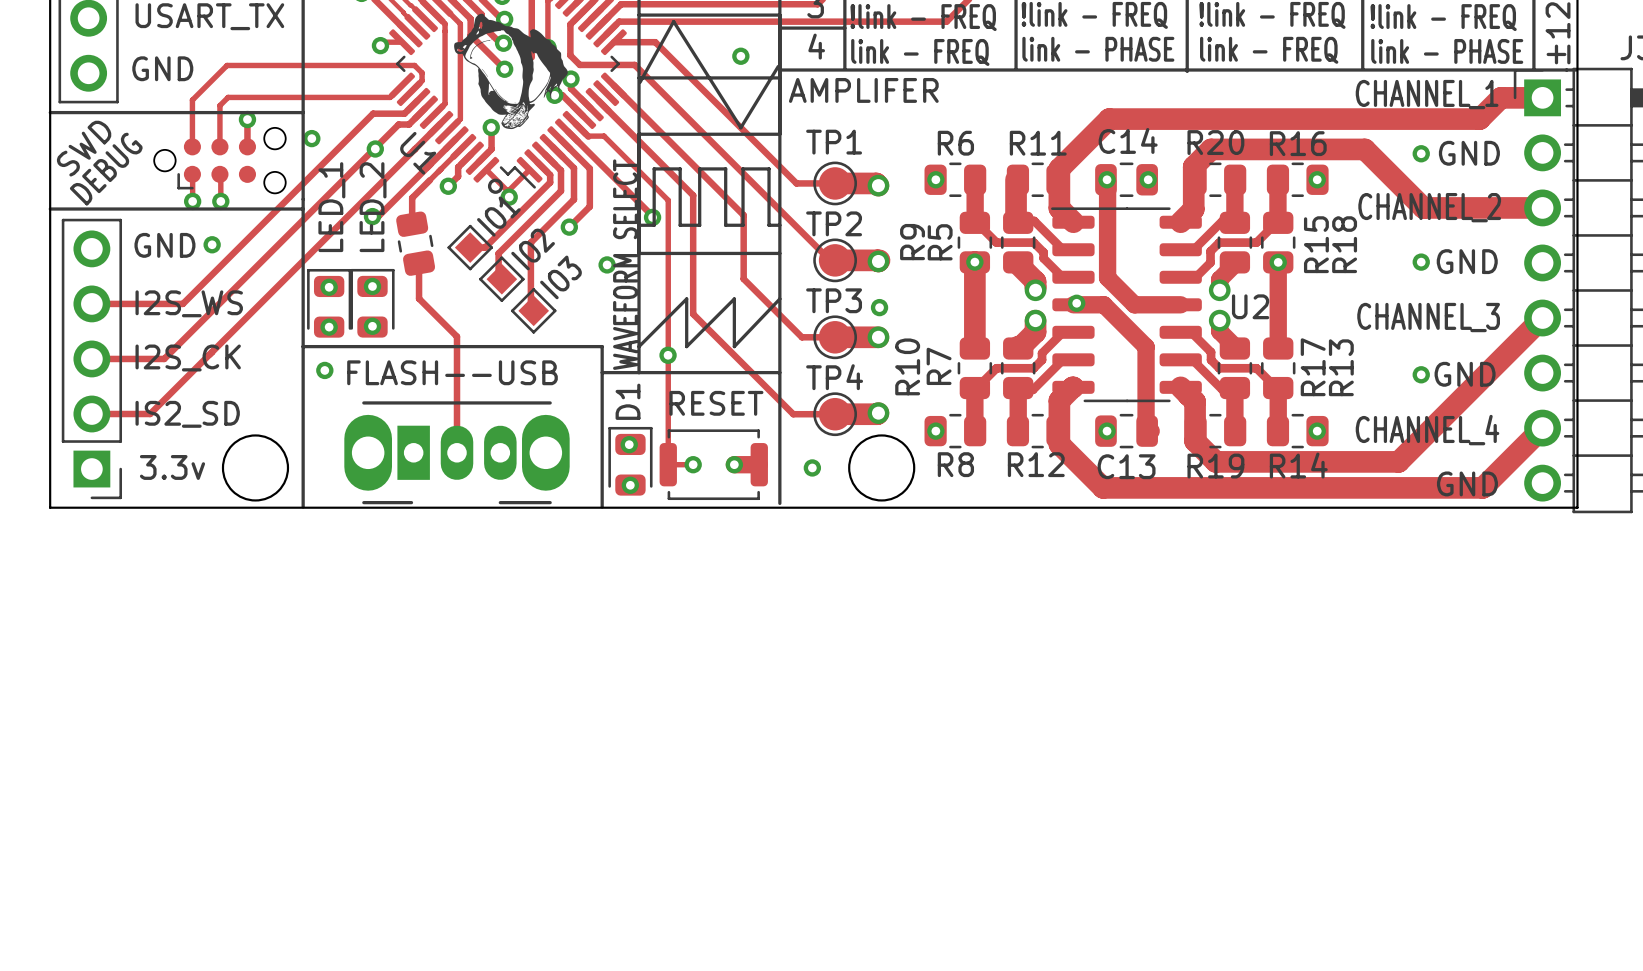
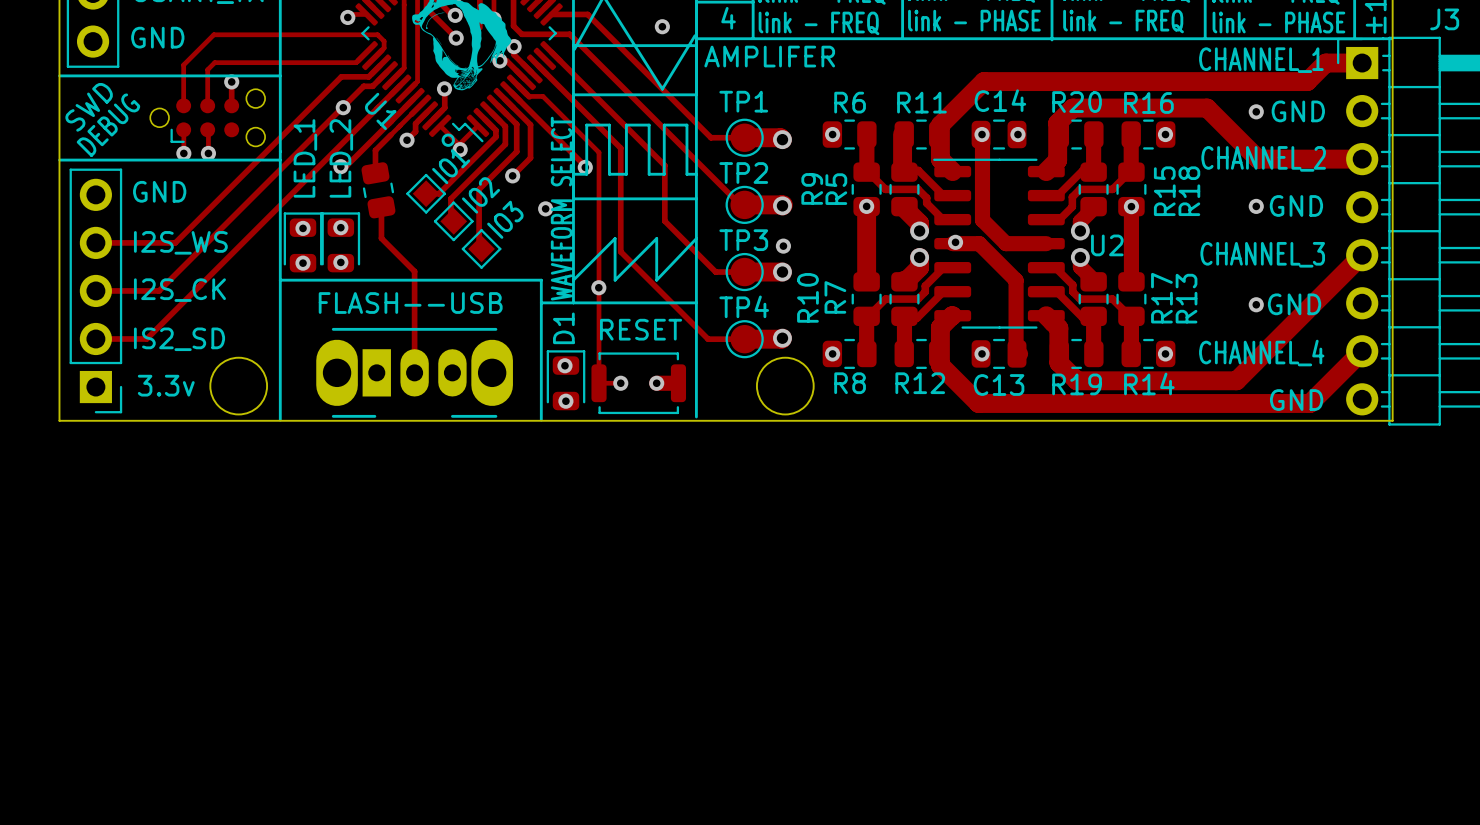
via: (311, 138) -> none
via: (212, 244) -> none
via: (324, 370) -> none
via: (812, 467) -> none

